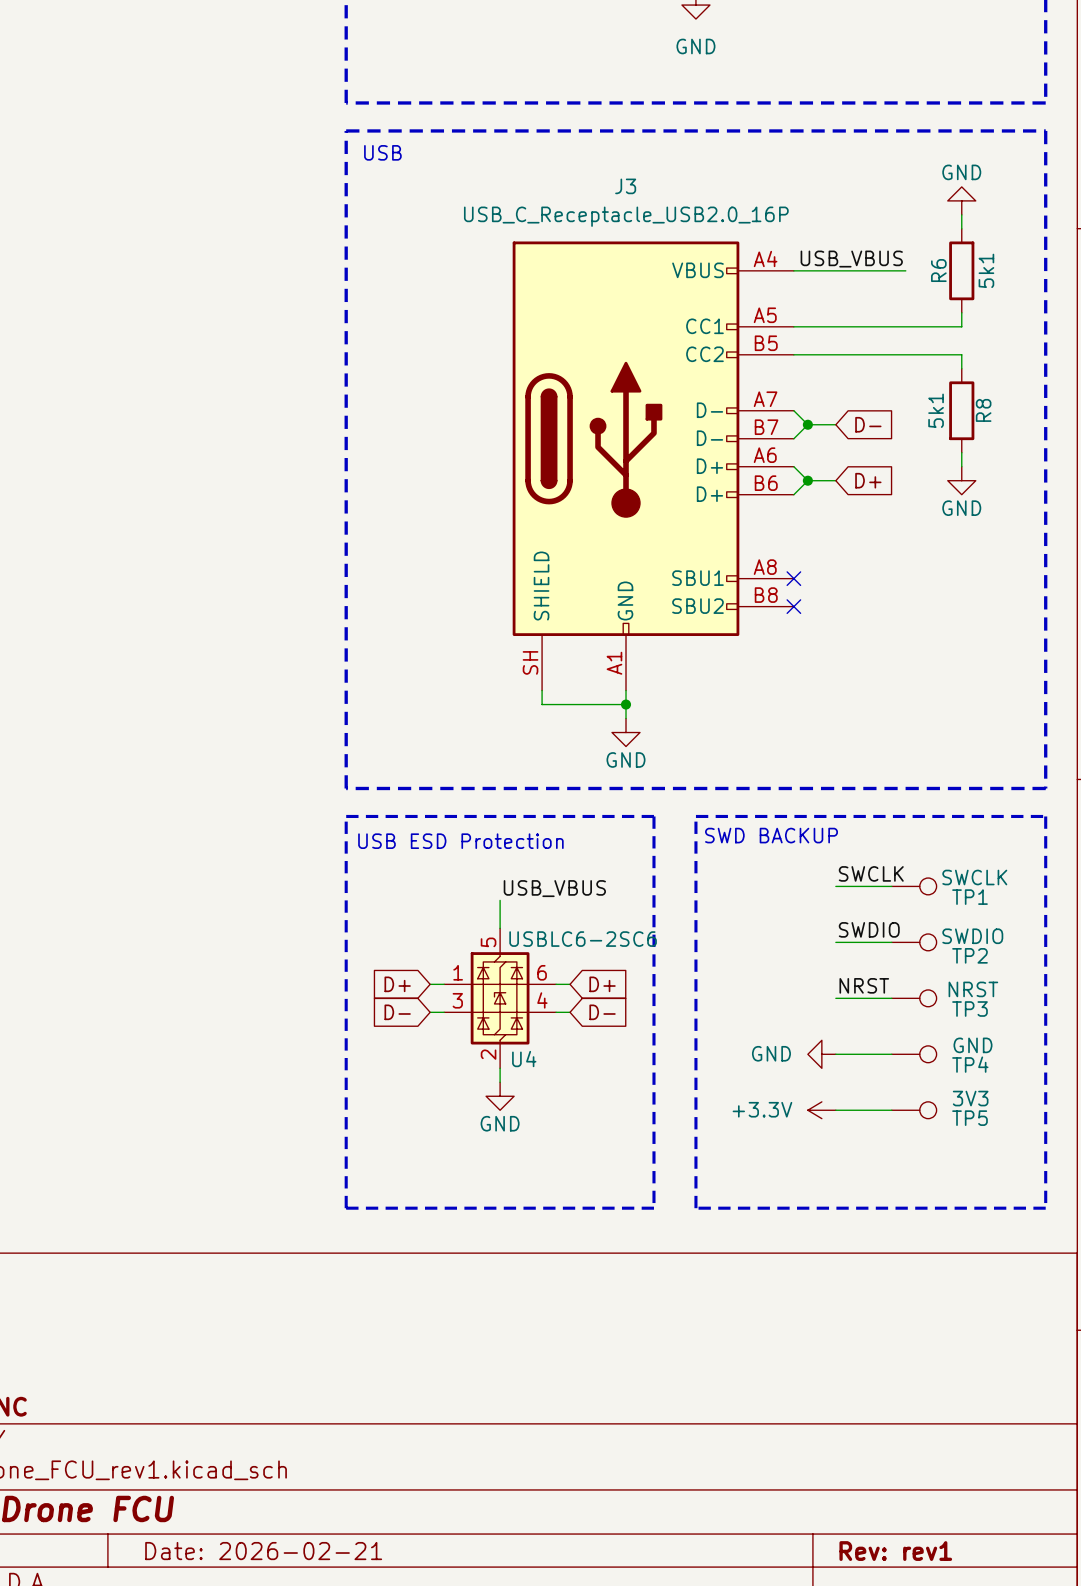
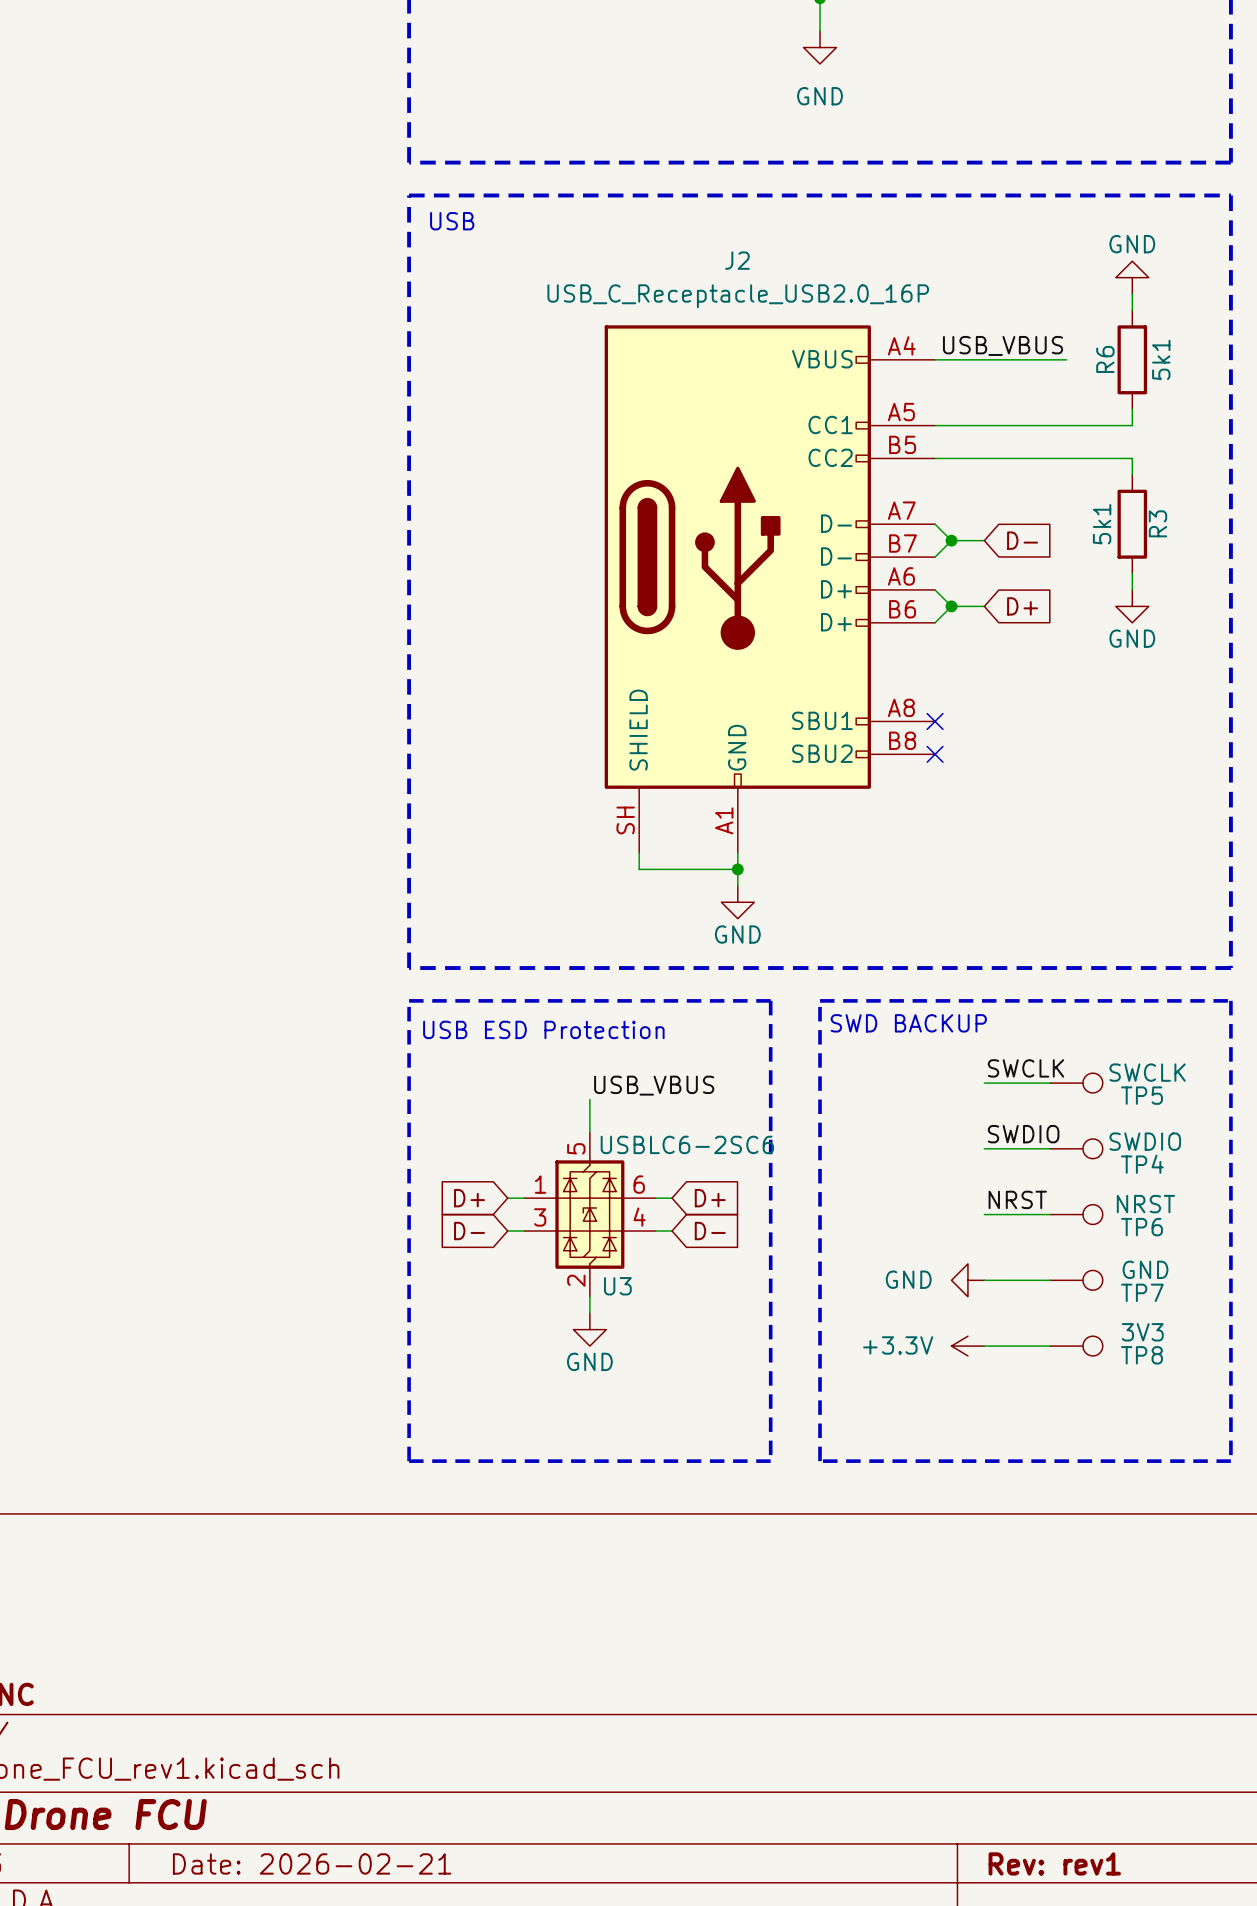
J3 name: J3 (625, 186) -> J2 (737, 260)
R8 name: R8 (983, 410) -> R3 (1157, 523)
TP1 name: TP1 (969, 897) -> TP5 (1141, 1095)
TP2 name: TP2 (969, 955) -> TP4 (1142, 1164)
TP3 name: TP3 (969, 1009) -> TP6 (1141, 1227)
U4 name: U4 (524, 1059) -> U3 (617, 1286)
TP4 name: TP4 (970, 1064) -> TP7 (1142, 1292)
TP5 name: TP5 (969, 1118) -> TP8 (1141, 1355)

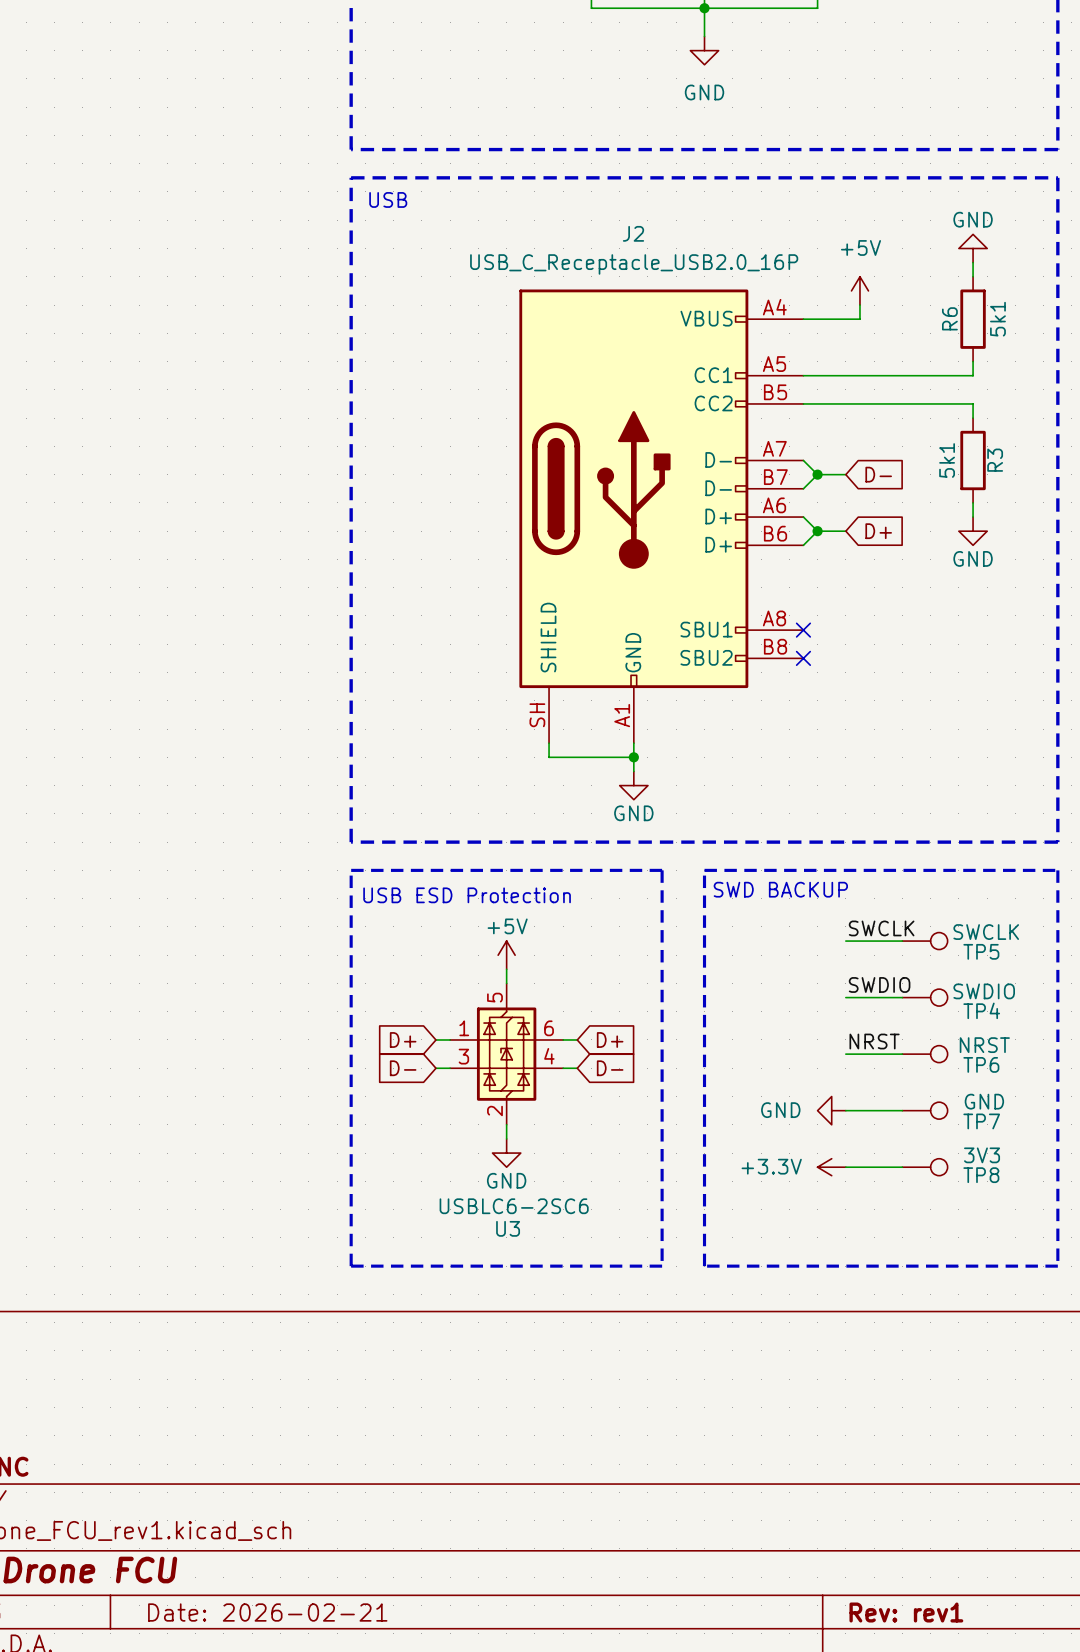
power symbol: none -> +5V (859, 290)
label: USB_VBUS (1003, 345) -> none
wire: (1000, 359) (1066, 359) -> (859, 319) (859, 305)
label: USB_VBUS (654, 1085) -> none
power symbol: none -> +5V (506, 955)
U3 value position: USBLC6-2SC6 (687, 1144) -> USBLC6-2SC6 (514, 1206)
U3 name position: U3 (617, 1286) -> U3 (508, 1228)

